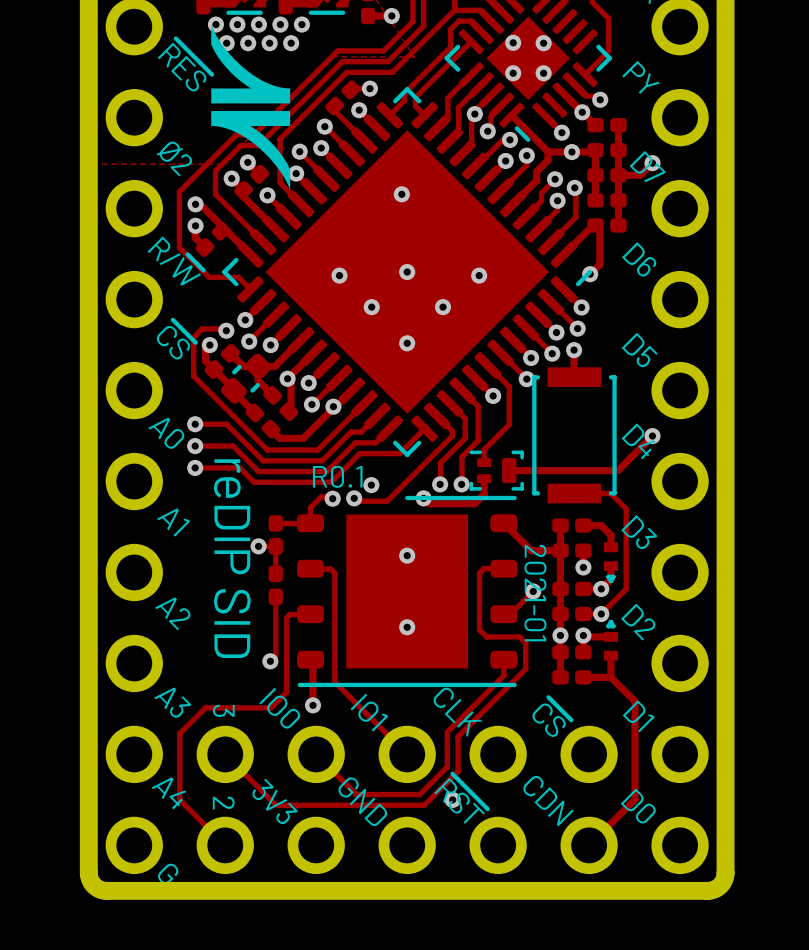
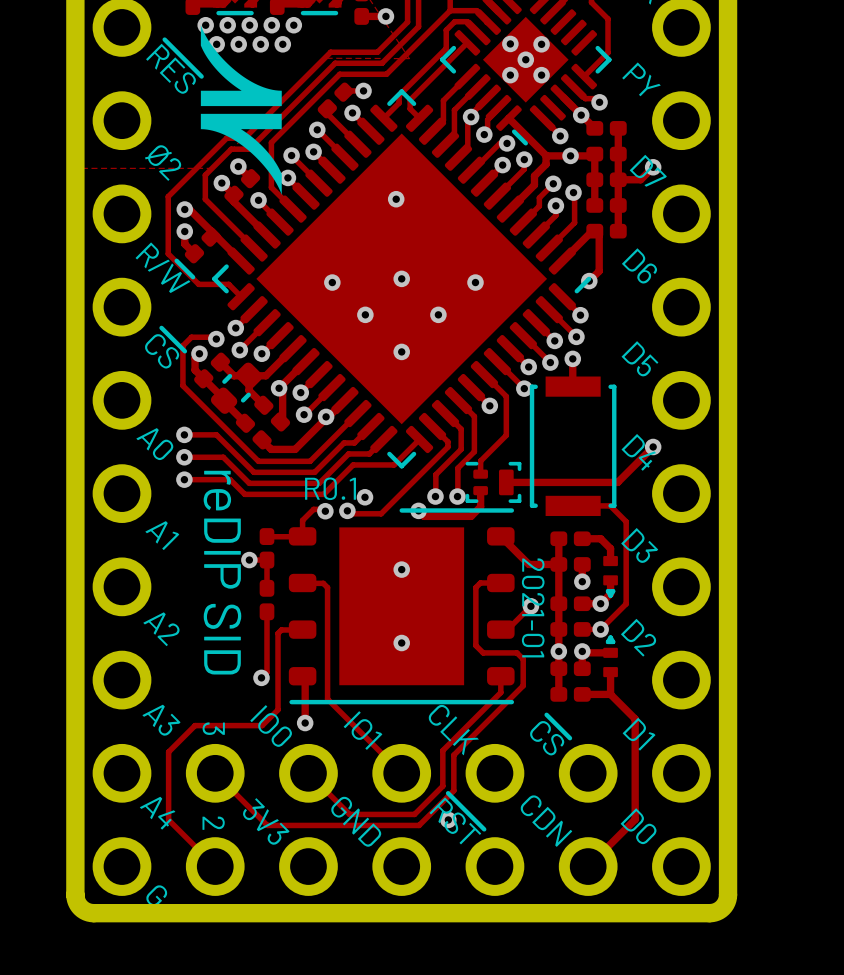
via: none -> (525, 59)

